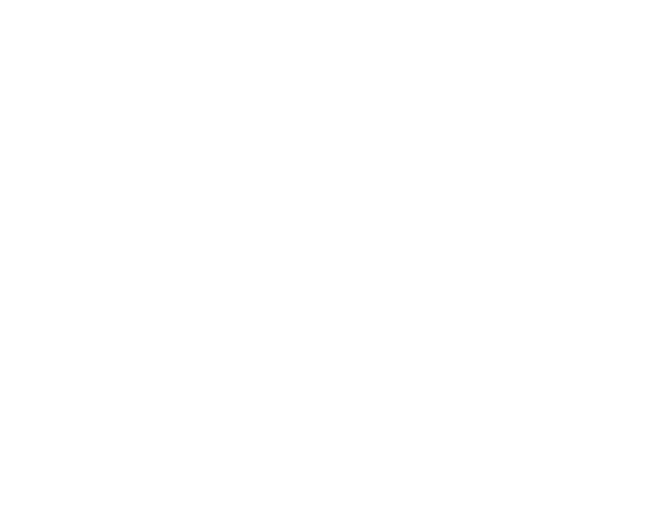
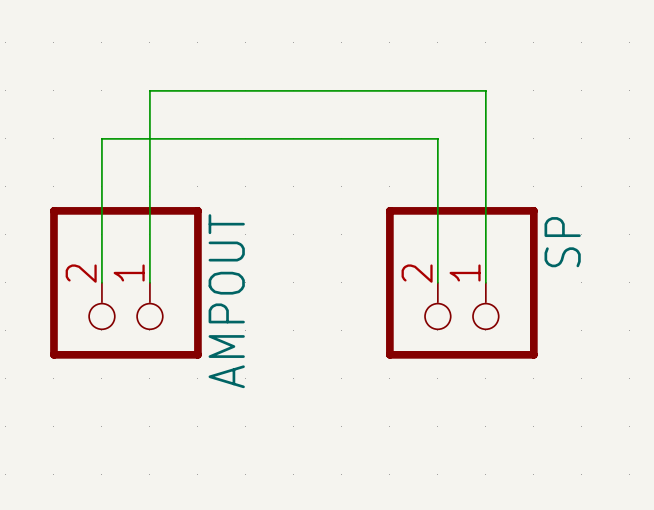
wire: none -> (101, 282) (101, 138) (437, 138) (437, 282)
AMPOUT: none -> (125, 282)
wire: none -> (149, 282) (149, 90) (485, 90) (485, 282)
SP: none -> (461, 282)

